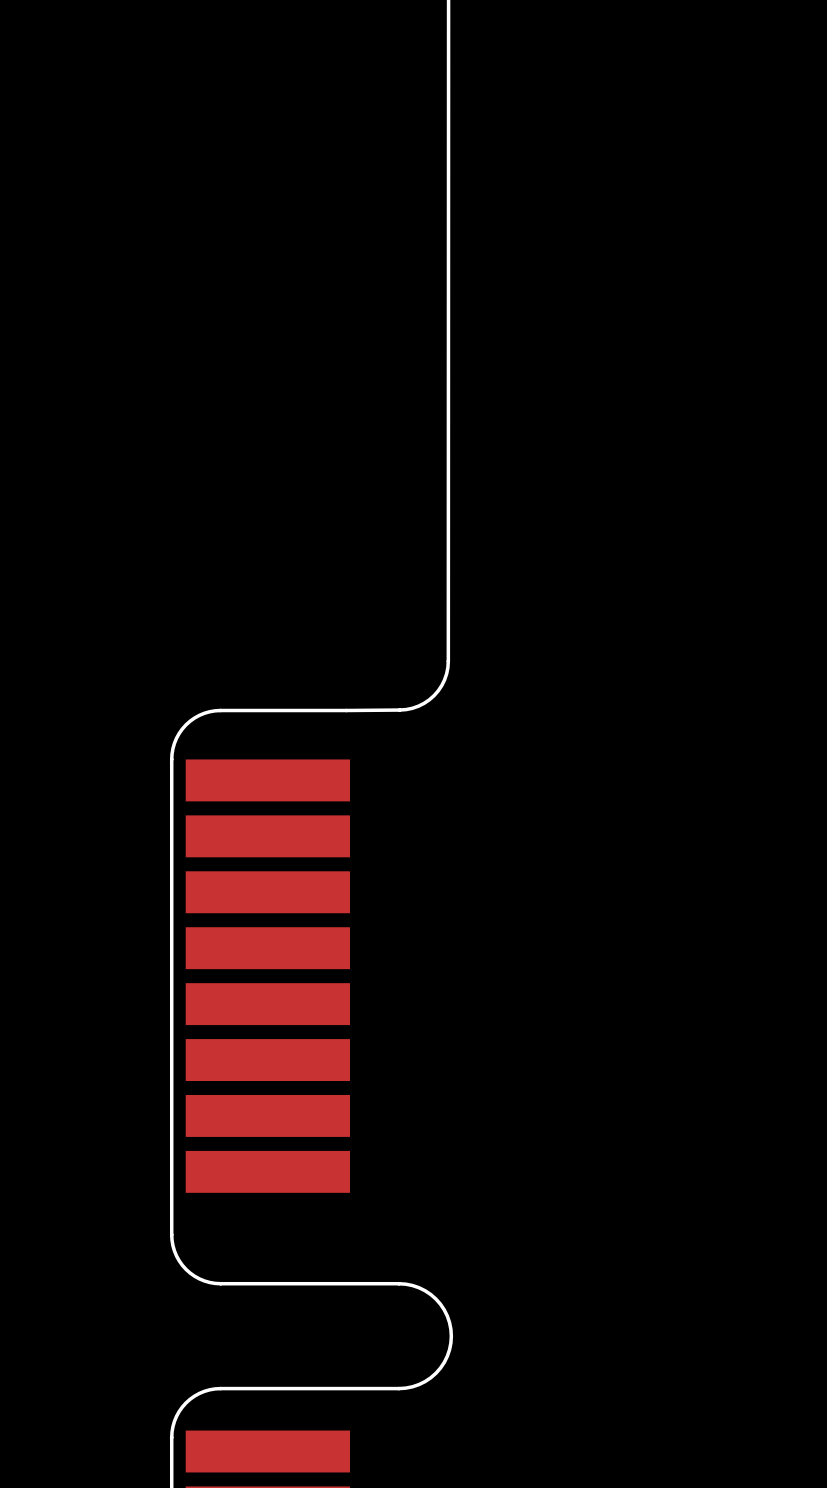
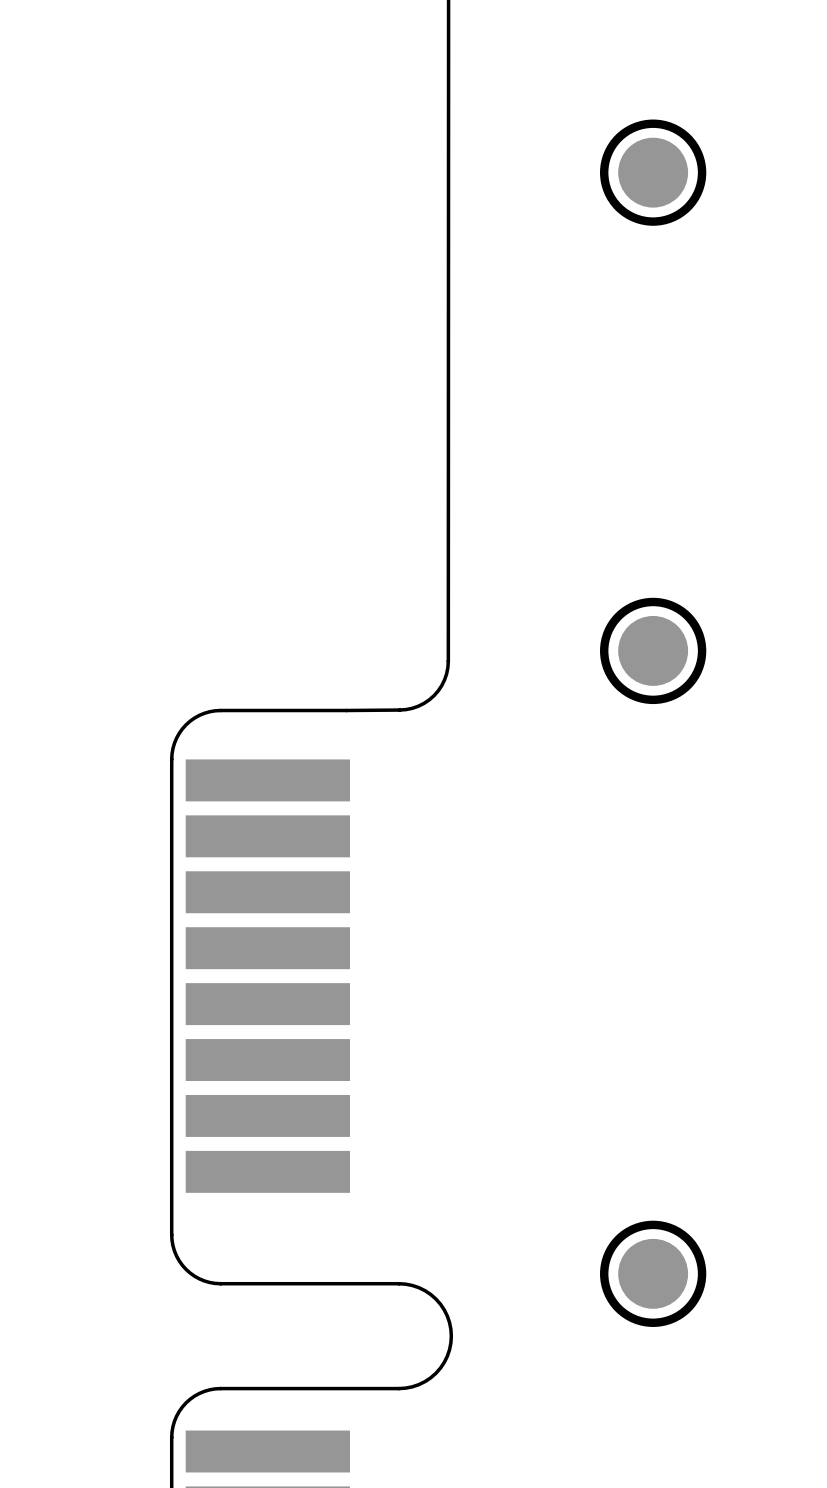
part: none -> (653, 172)
part: none -> (653, 650)
part: none -> (653, 1273)

